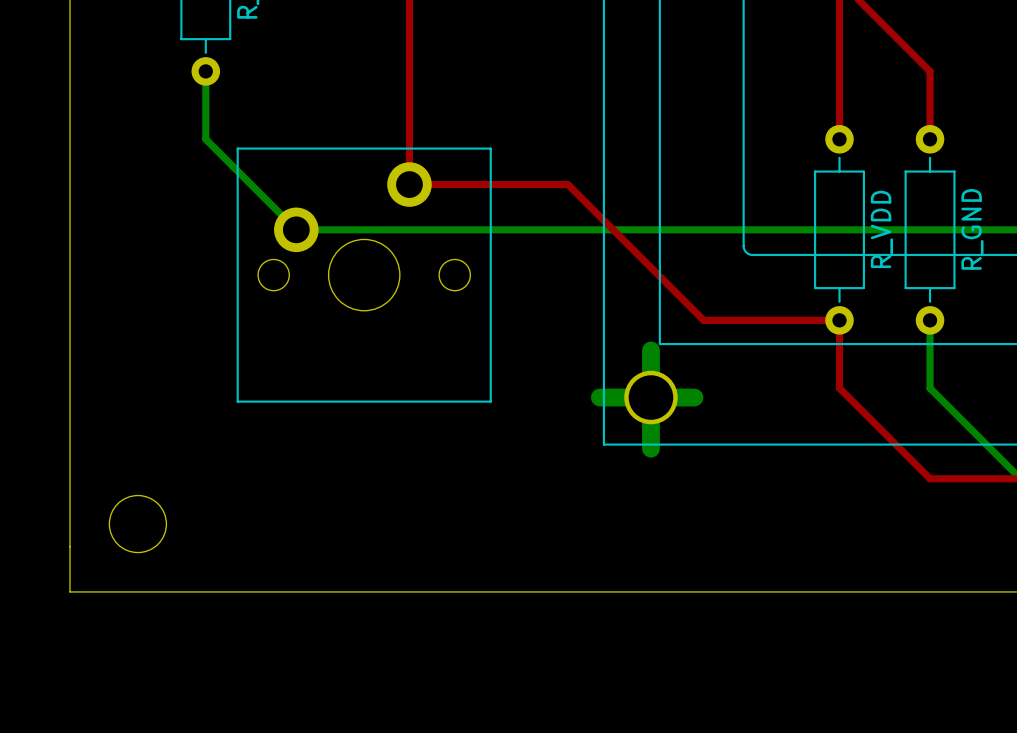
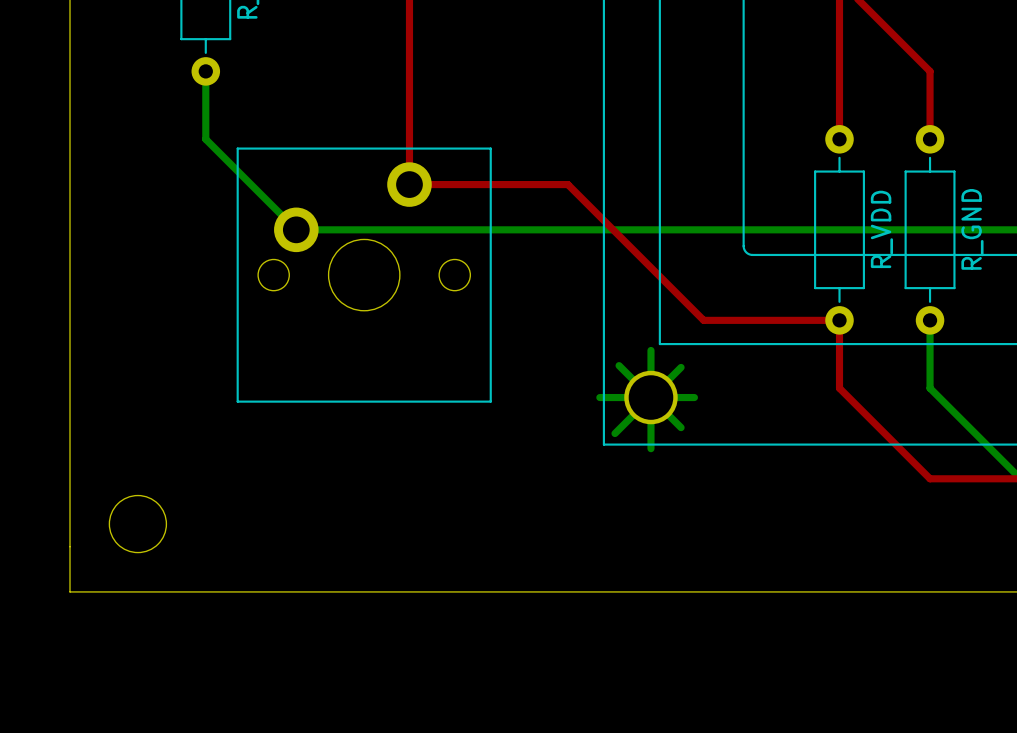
bottom track width: thick (650, 350) (650, 448) -> thin (650, 350) (650, 448)
bottom track: none -> (619, 365) (681, 427)
bottom track: none -> (681, 367) (614, 433)
bottom track width: thick (599, 397) (694, 397) -> thin (599, 397) (694, 397)

